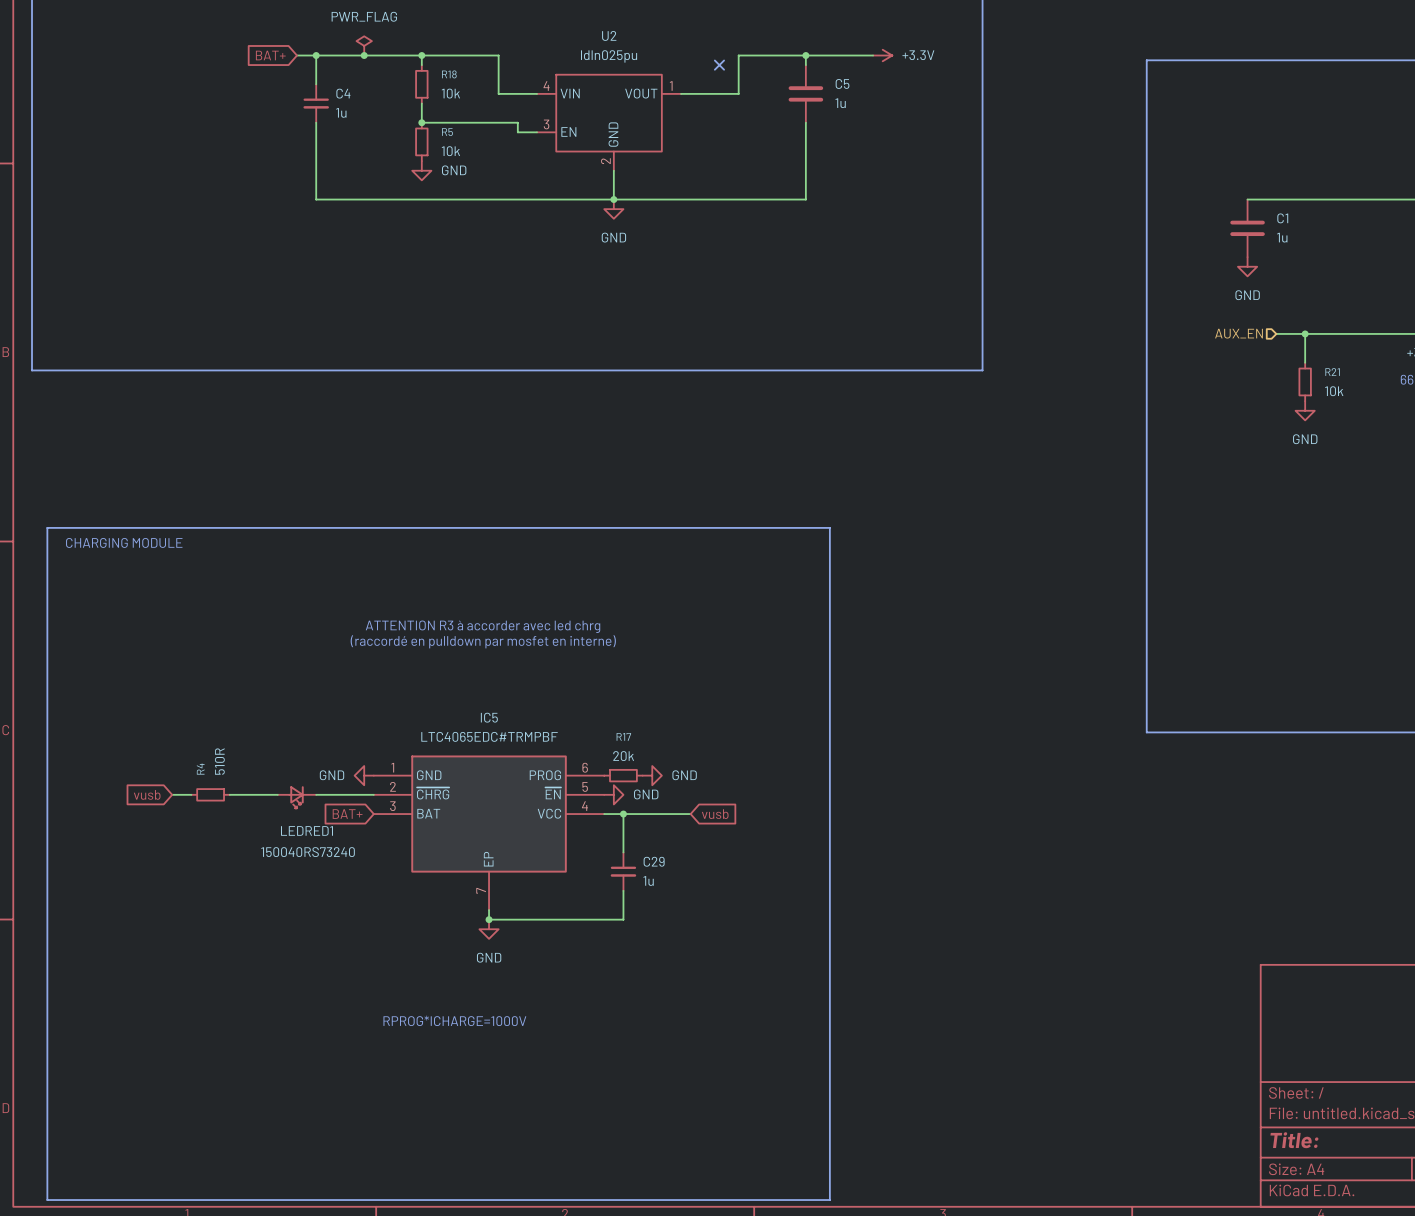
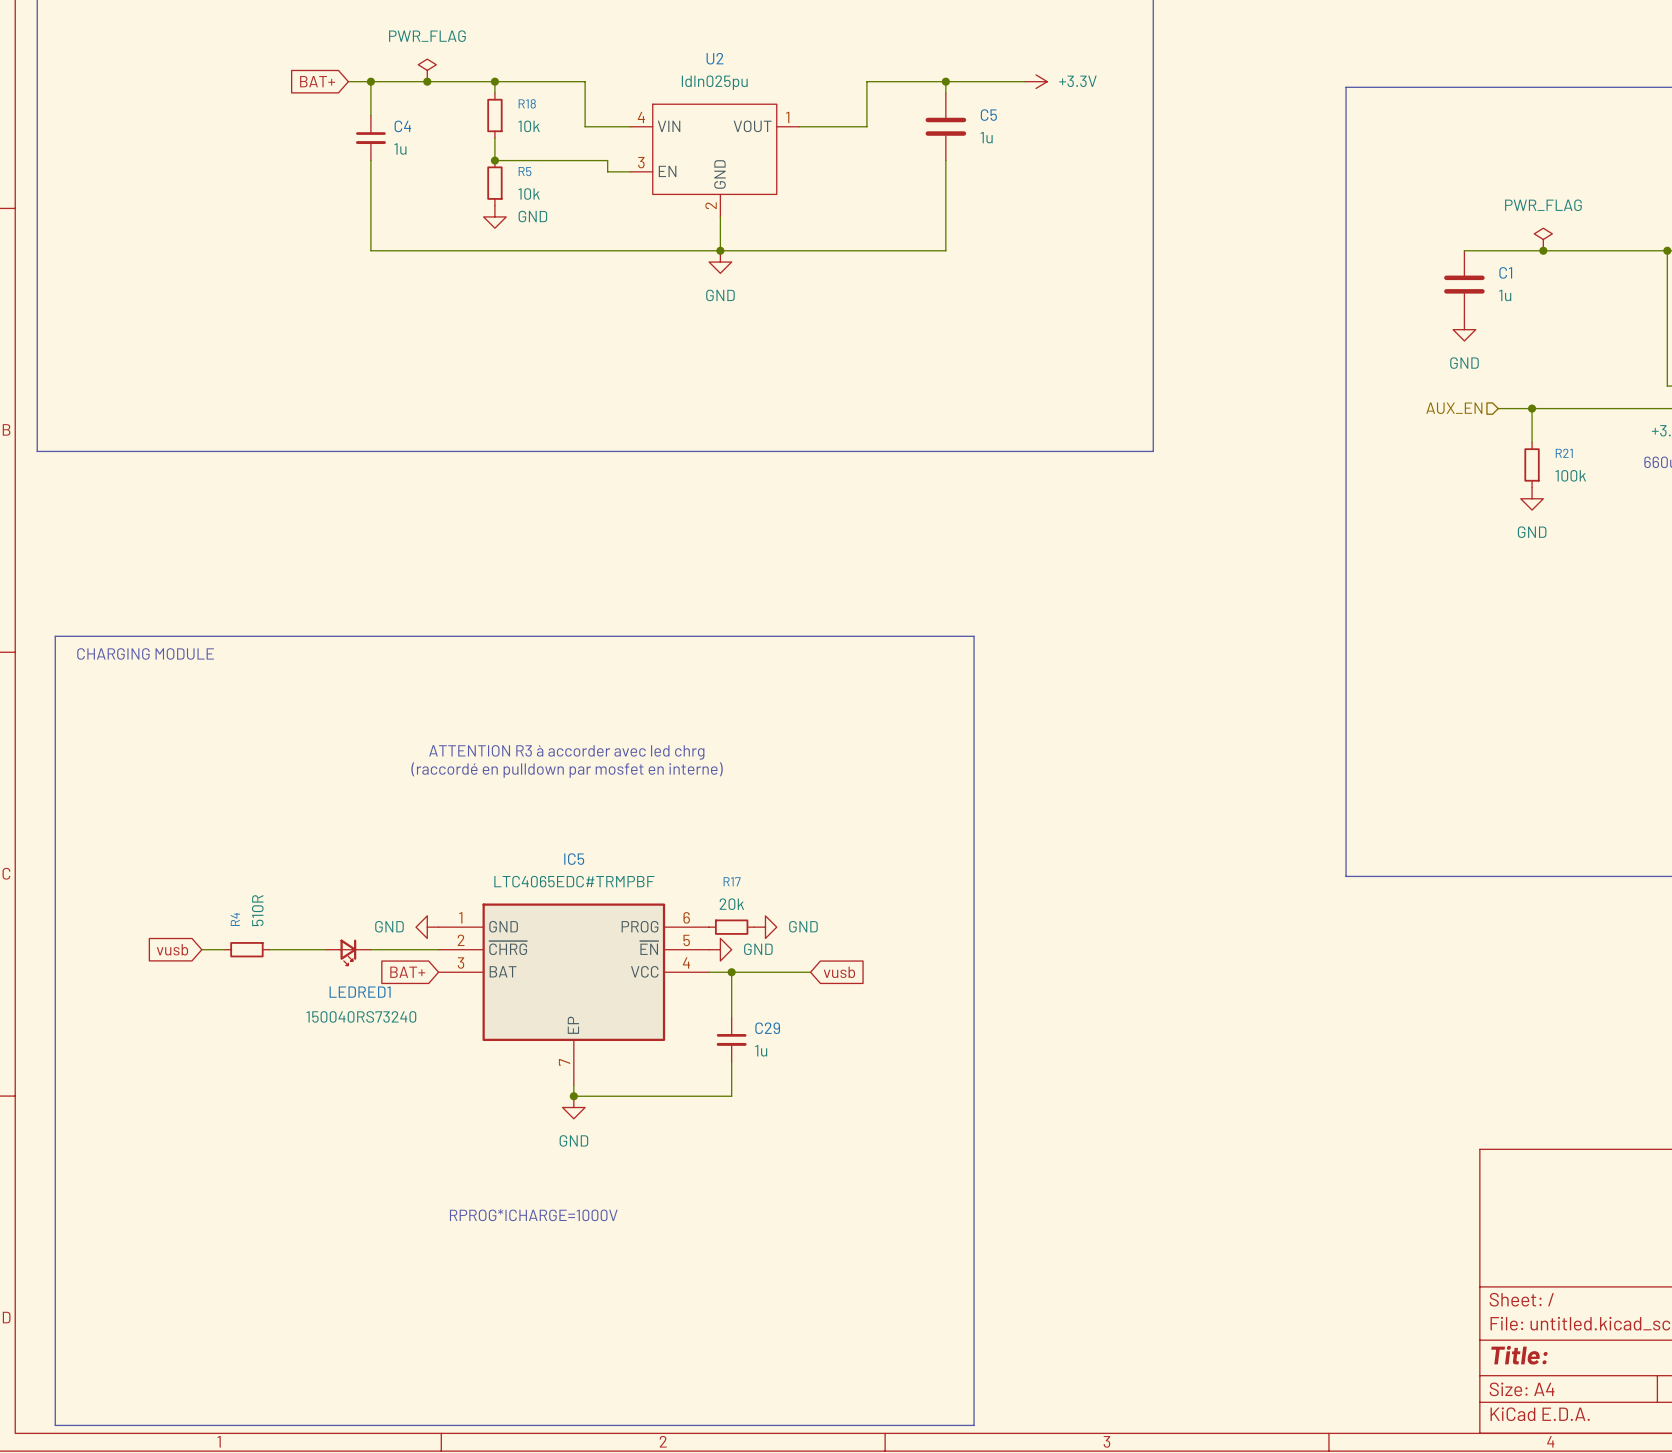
no-connect mark: (719, 65) -> none
power symbol: none -> PWR_FLAG (1543, 239)
junction: none -> (1543, 250)
R21 value: 10k (1334, 391) -> 100k (1570, 475)

